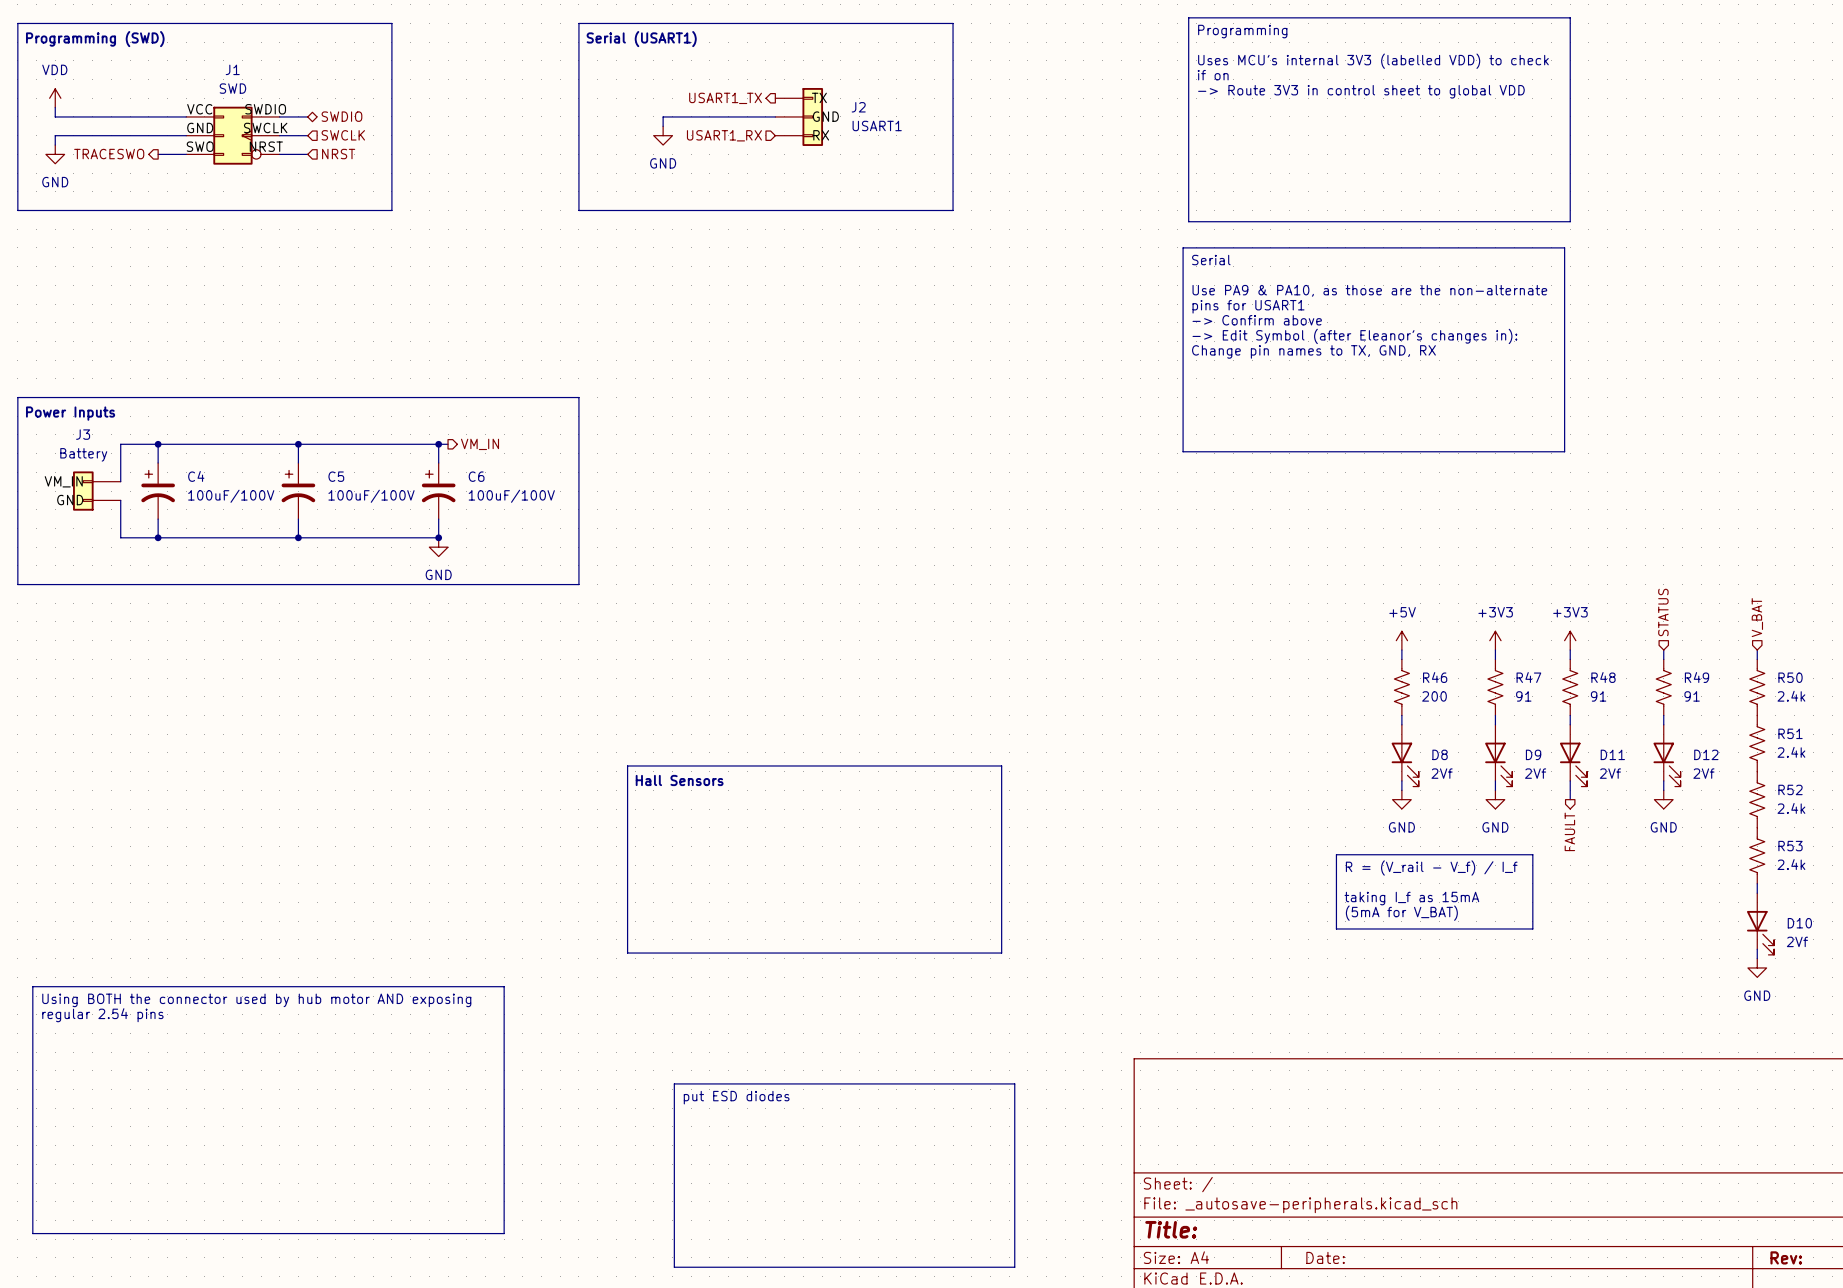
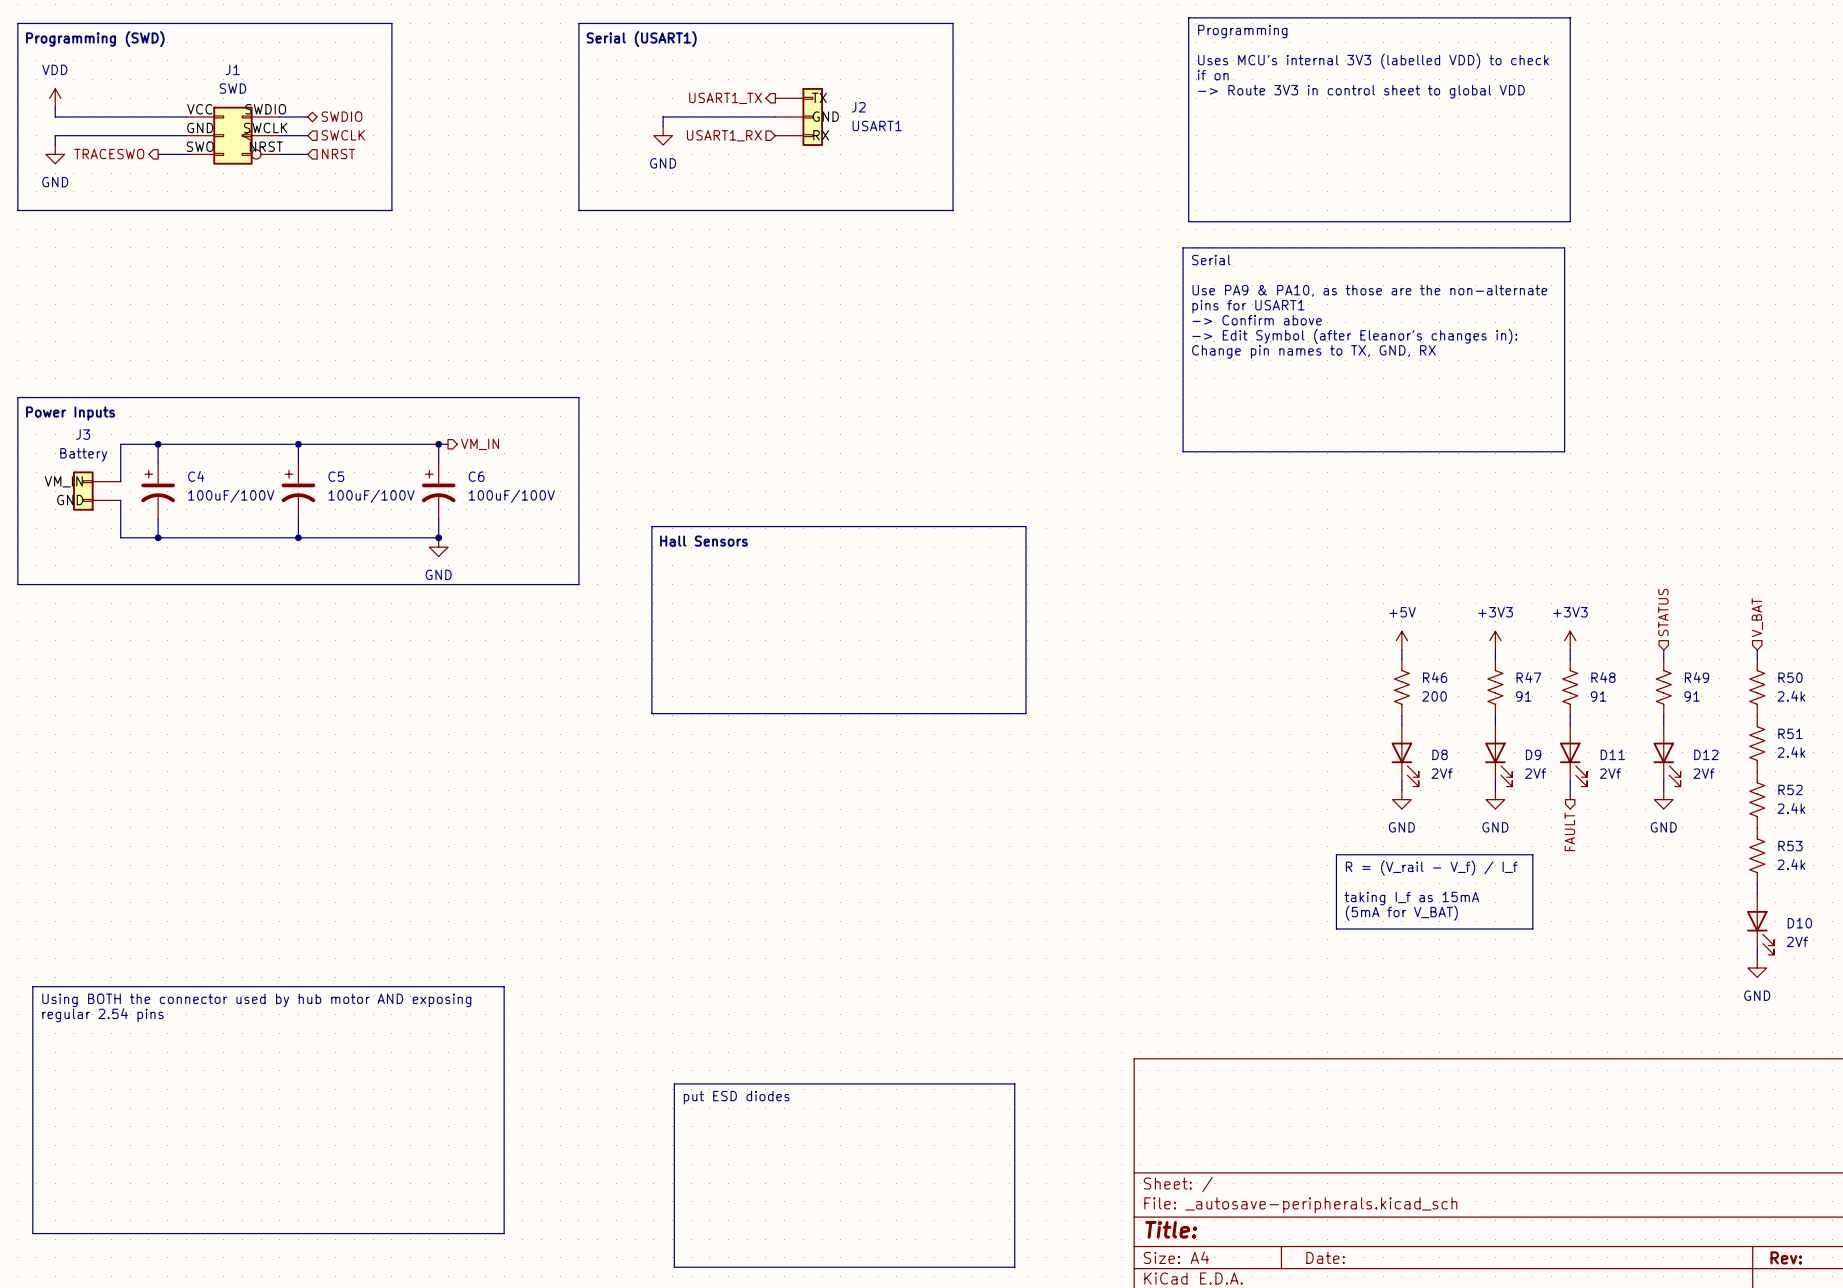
line: none -> (651, 526) (1025, 526) (1025, 713) (651, 713) (651, 526)
text: none -> Hall Sensors (703, 541)
line: (627, 765) (1001, 765) (1001, 953) (627, 953) (627, 765) -> none
text: Hall Sensors (679, 780) -> none

